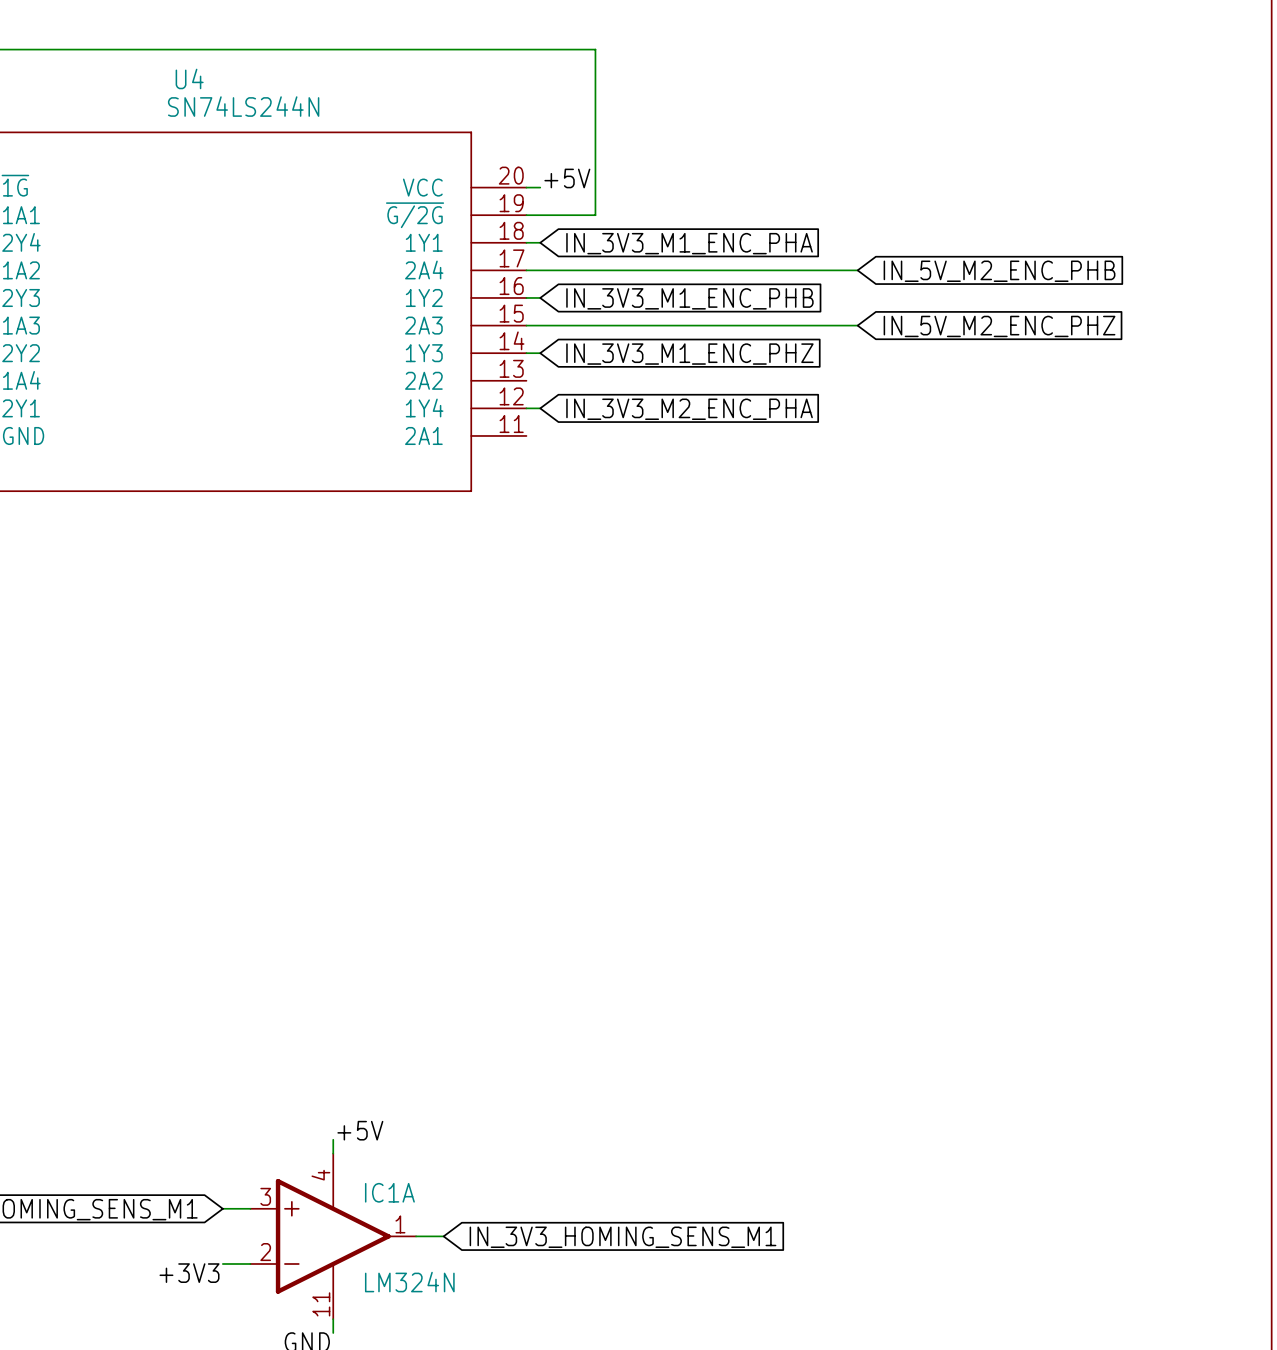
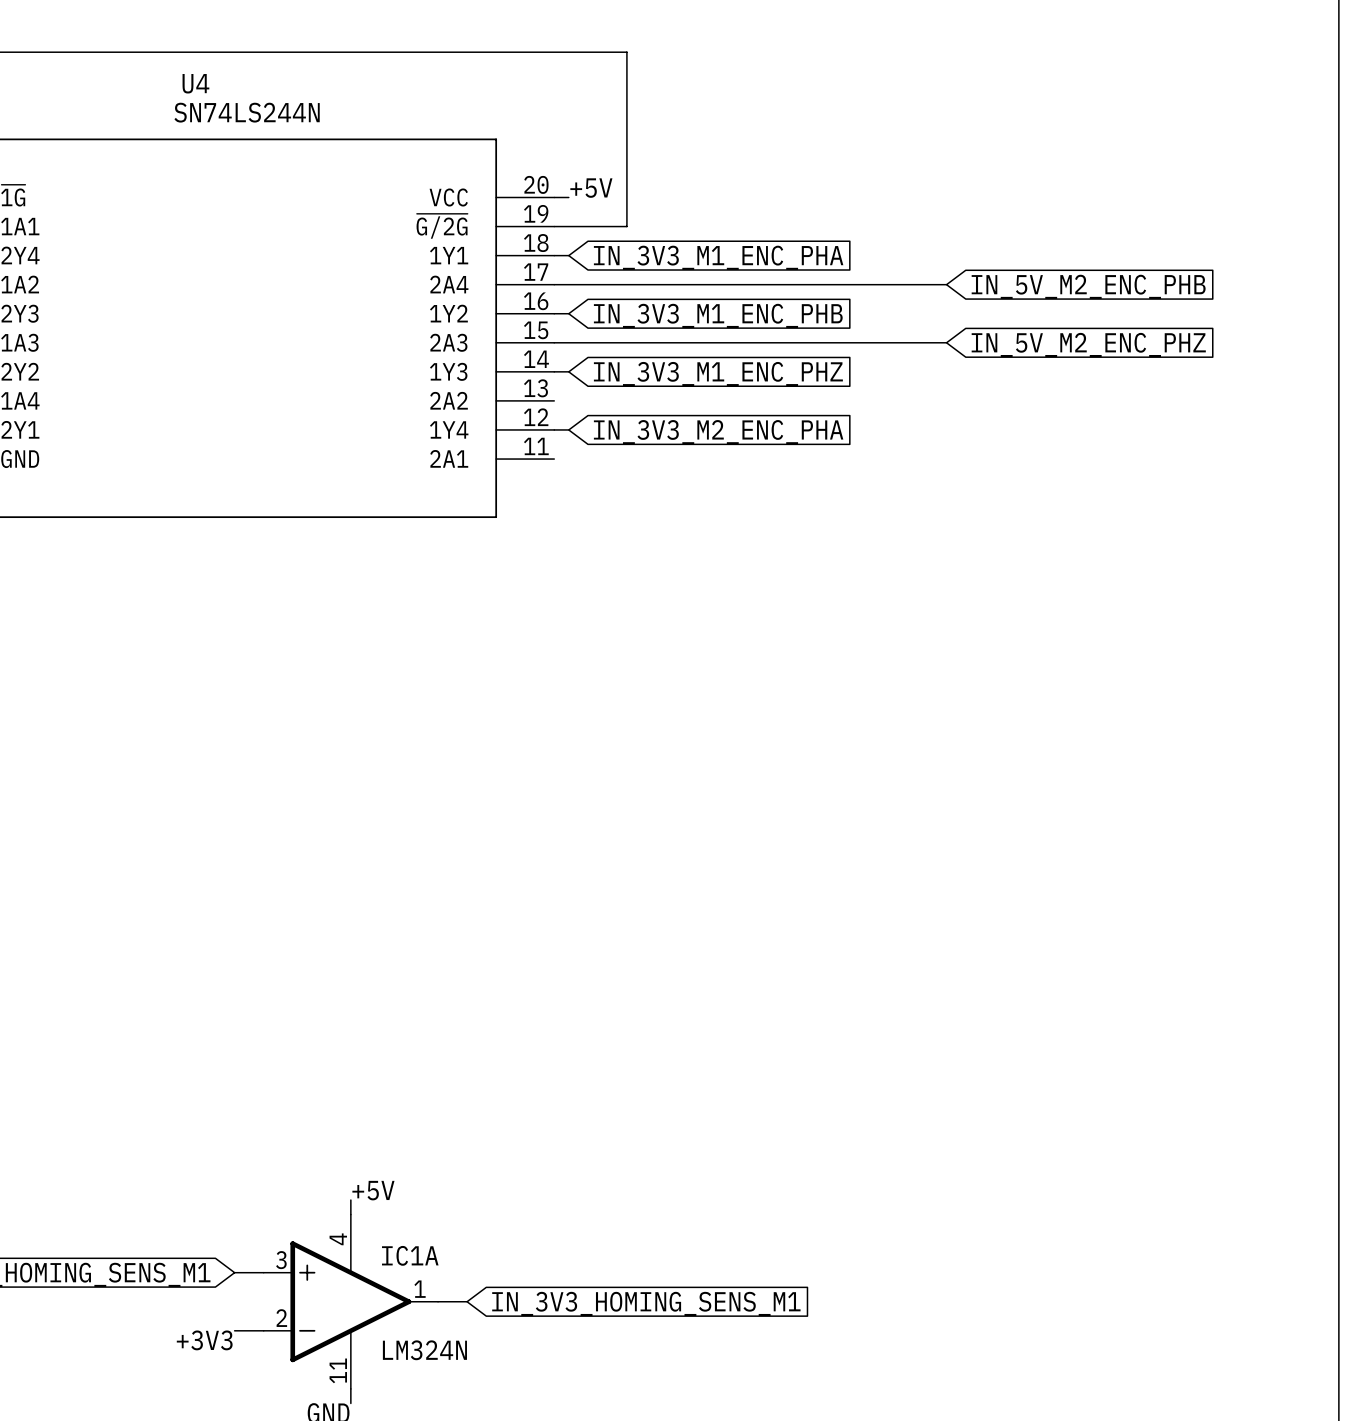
wire: none -> (902, 284) (946, 284)
global label position: IN_5V_M2_ENC_PHB (999, 271) -> IN_5V_M2_ENC_PHB (1088, 286)
wire: none -> (902, 342) (946, 342)
global label position: IN_5V_M2_ENC_PHZ (999, 326) -> IN_5V_M2_ENC_PHZ (1088, 344)

